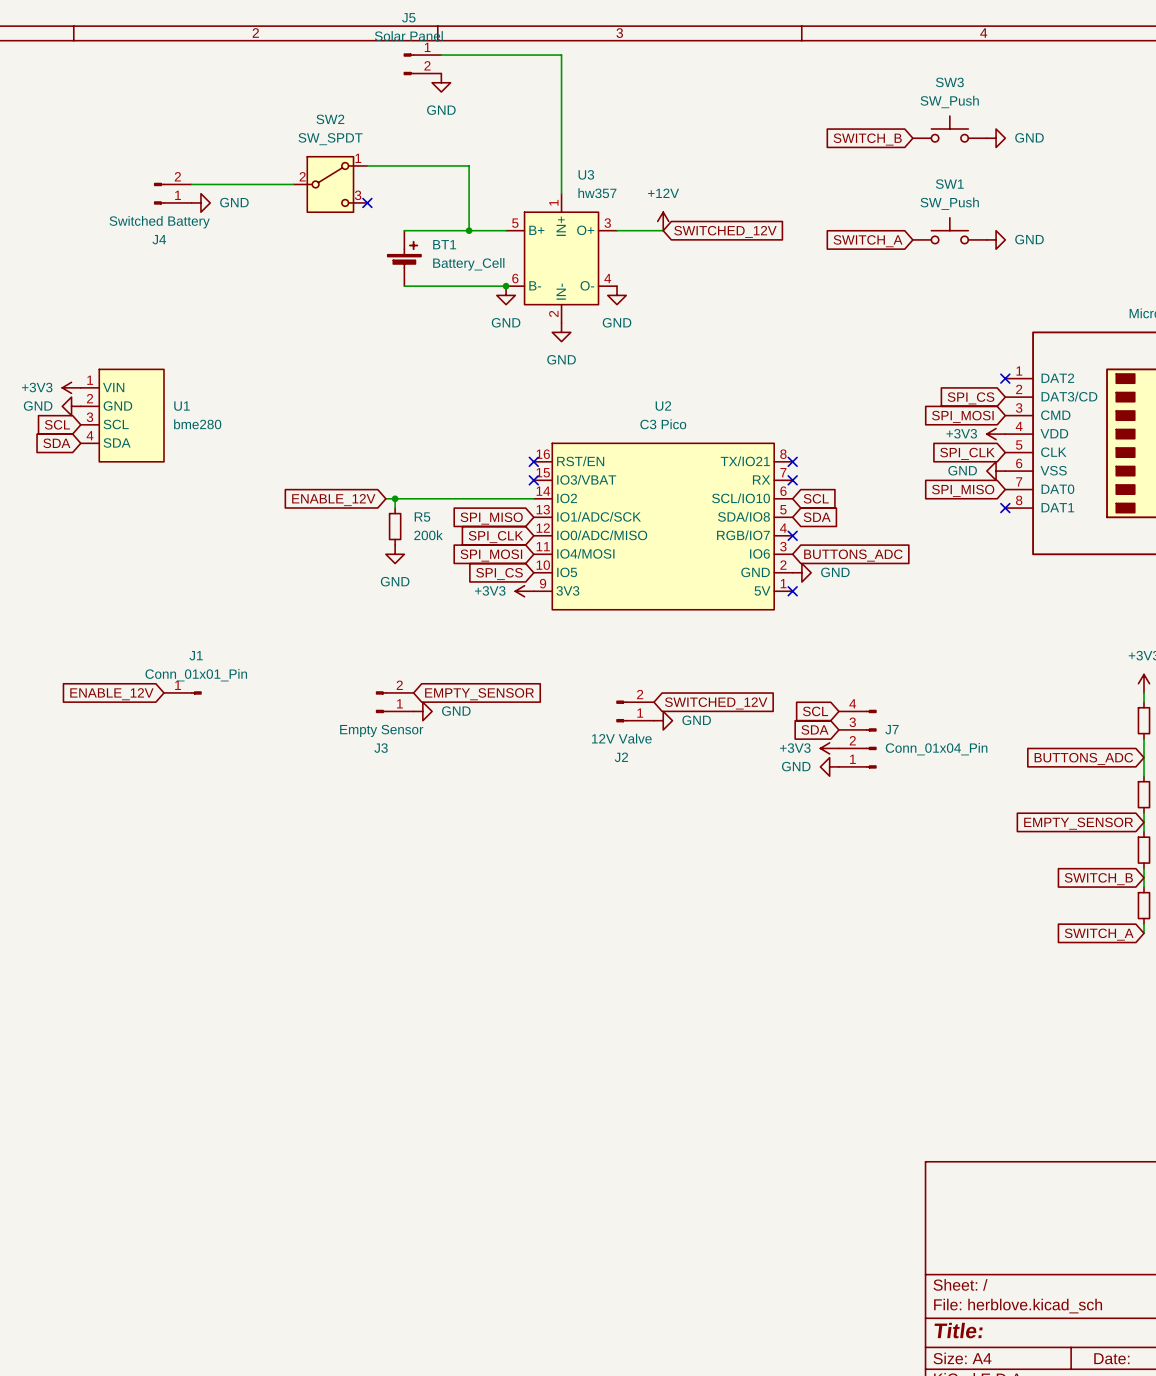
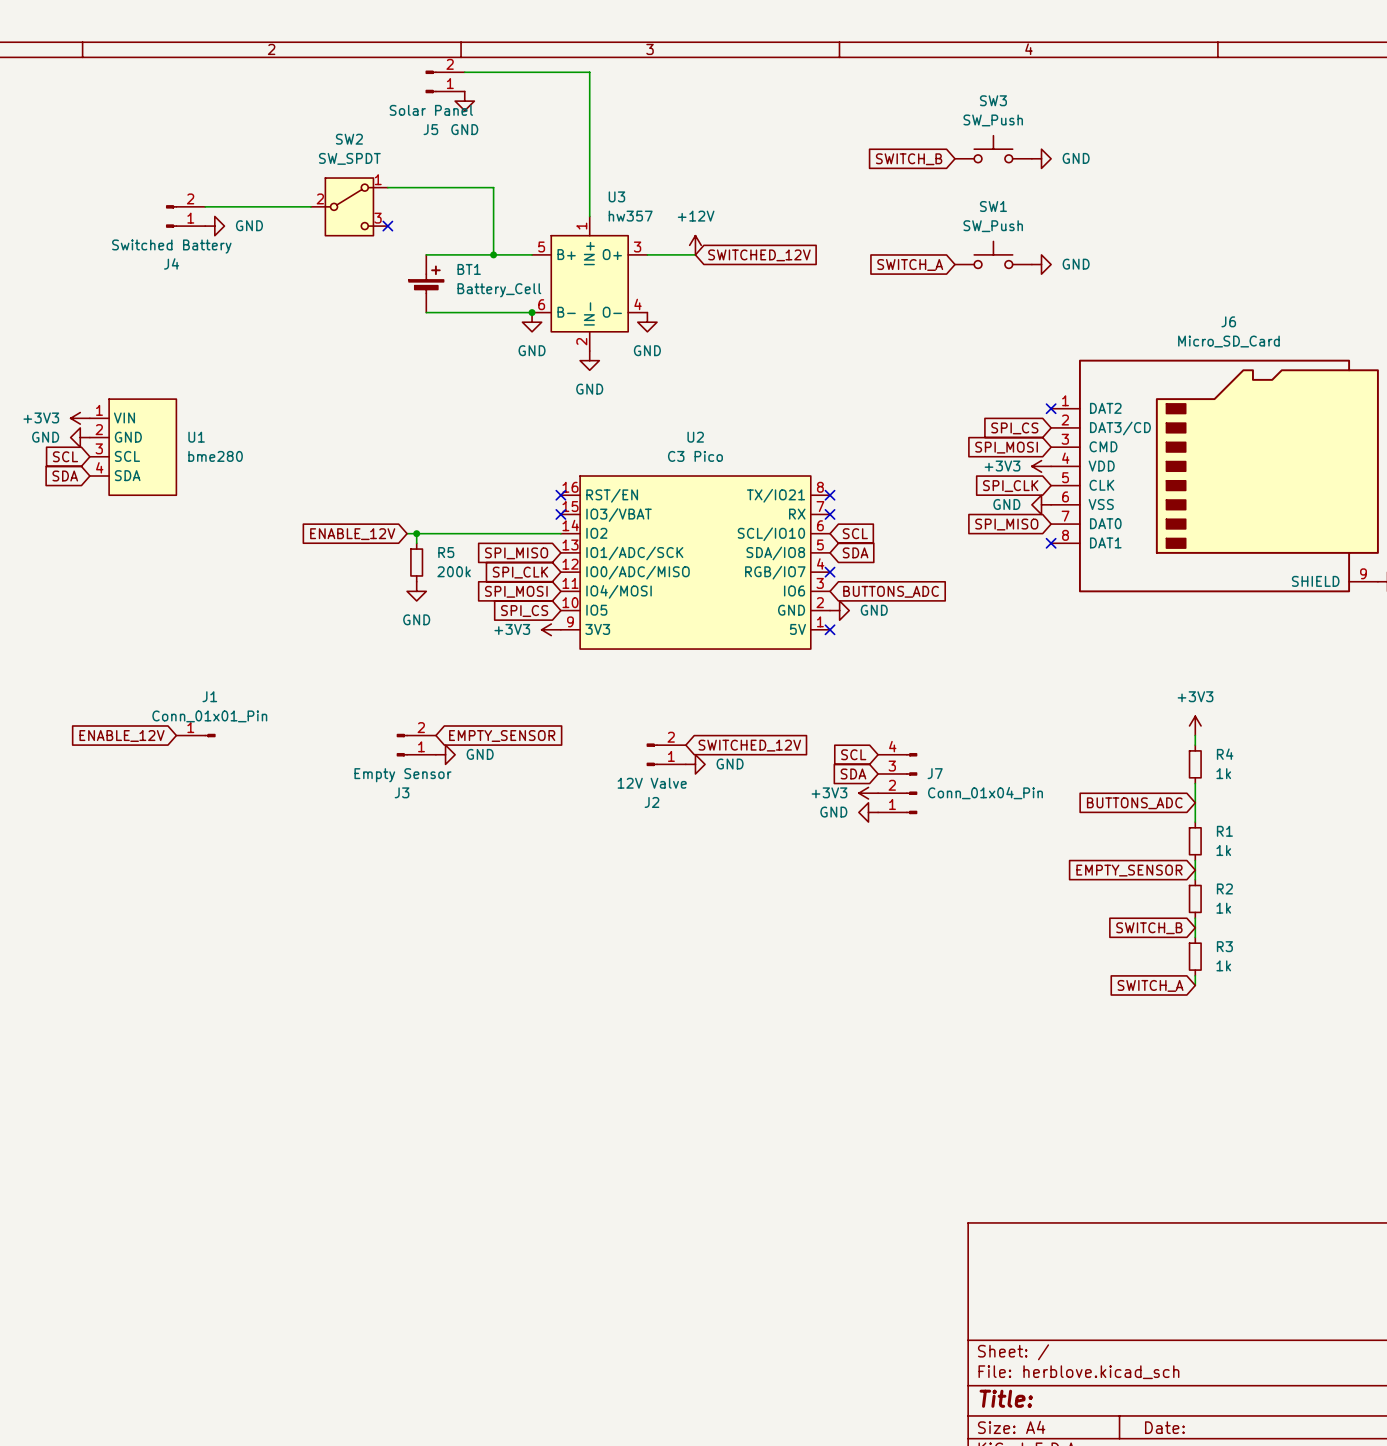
J5 flip: as is (408, 64) -> up-down (431, 81)

